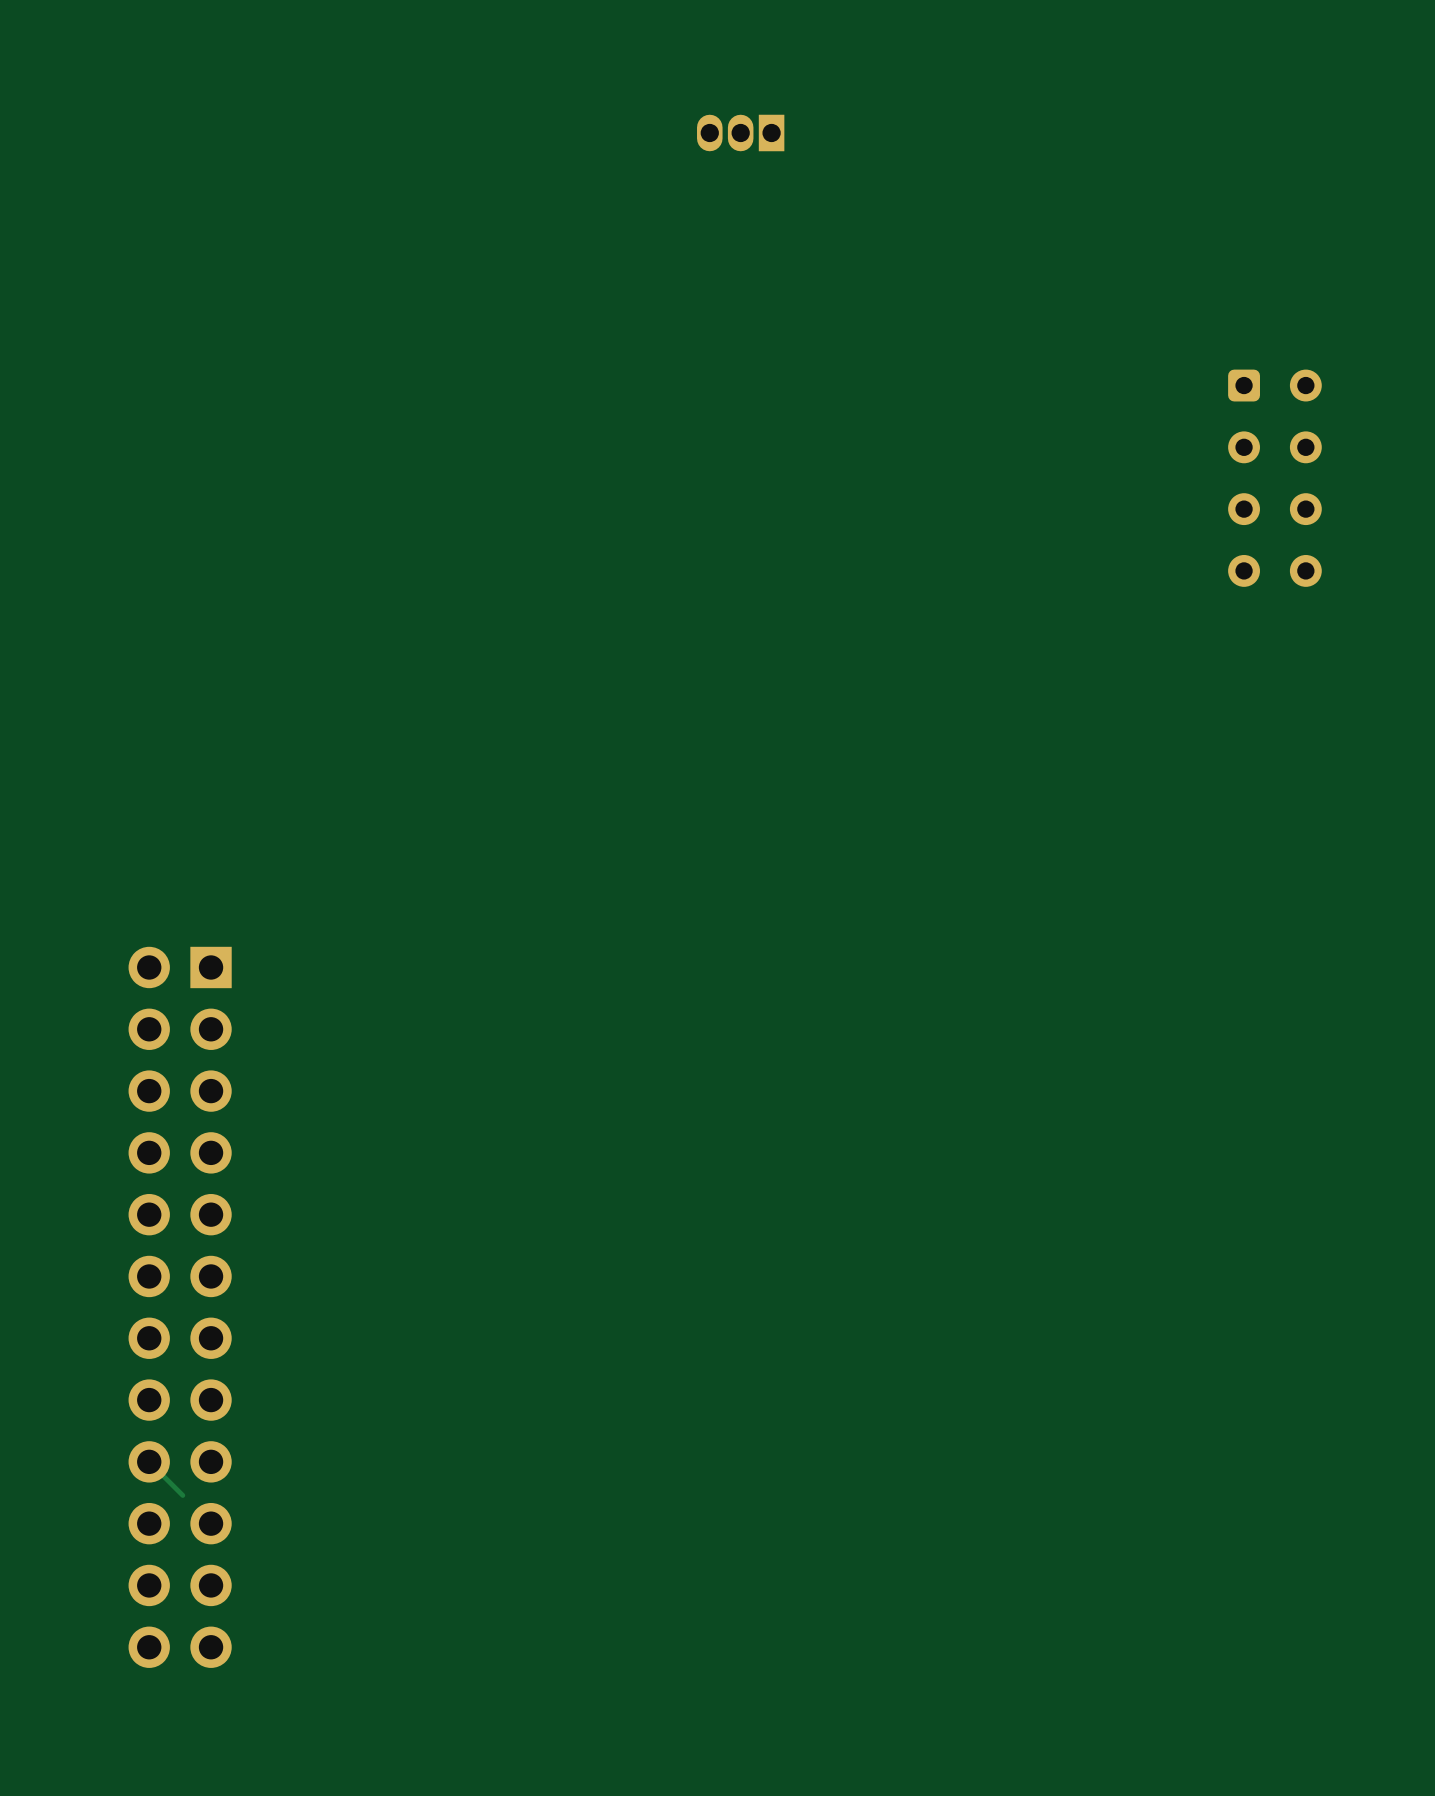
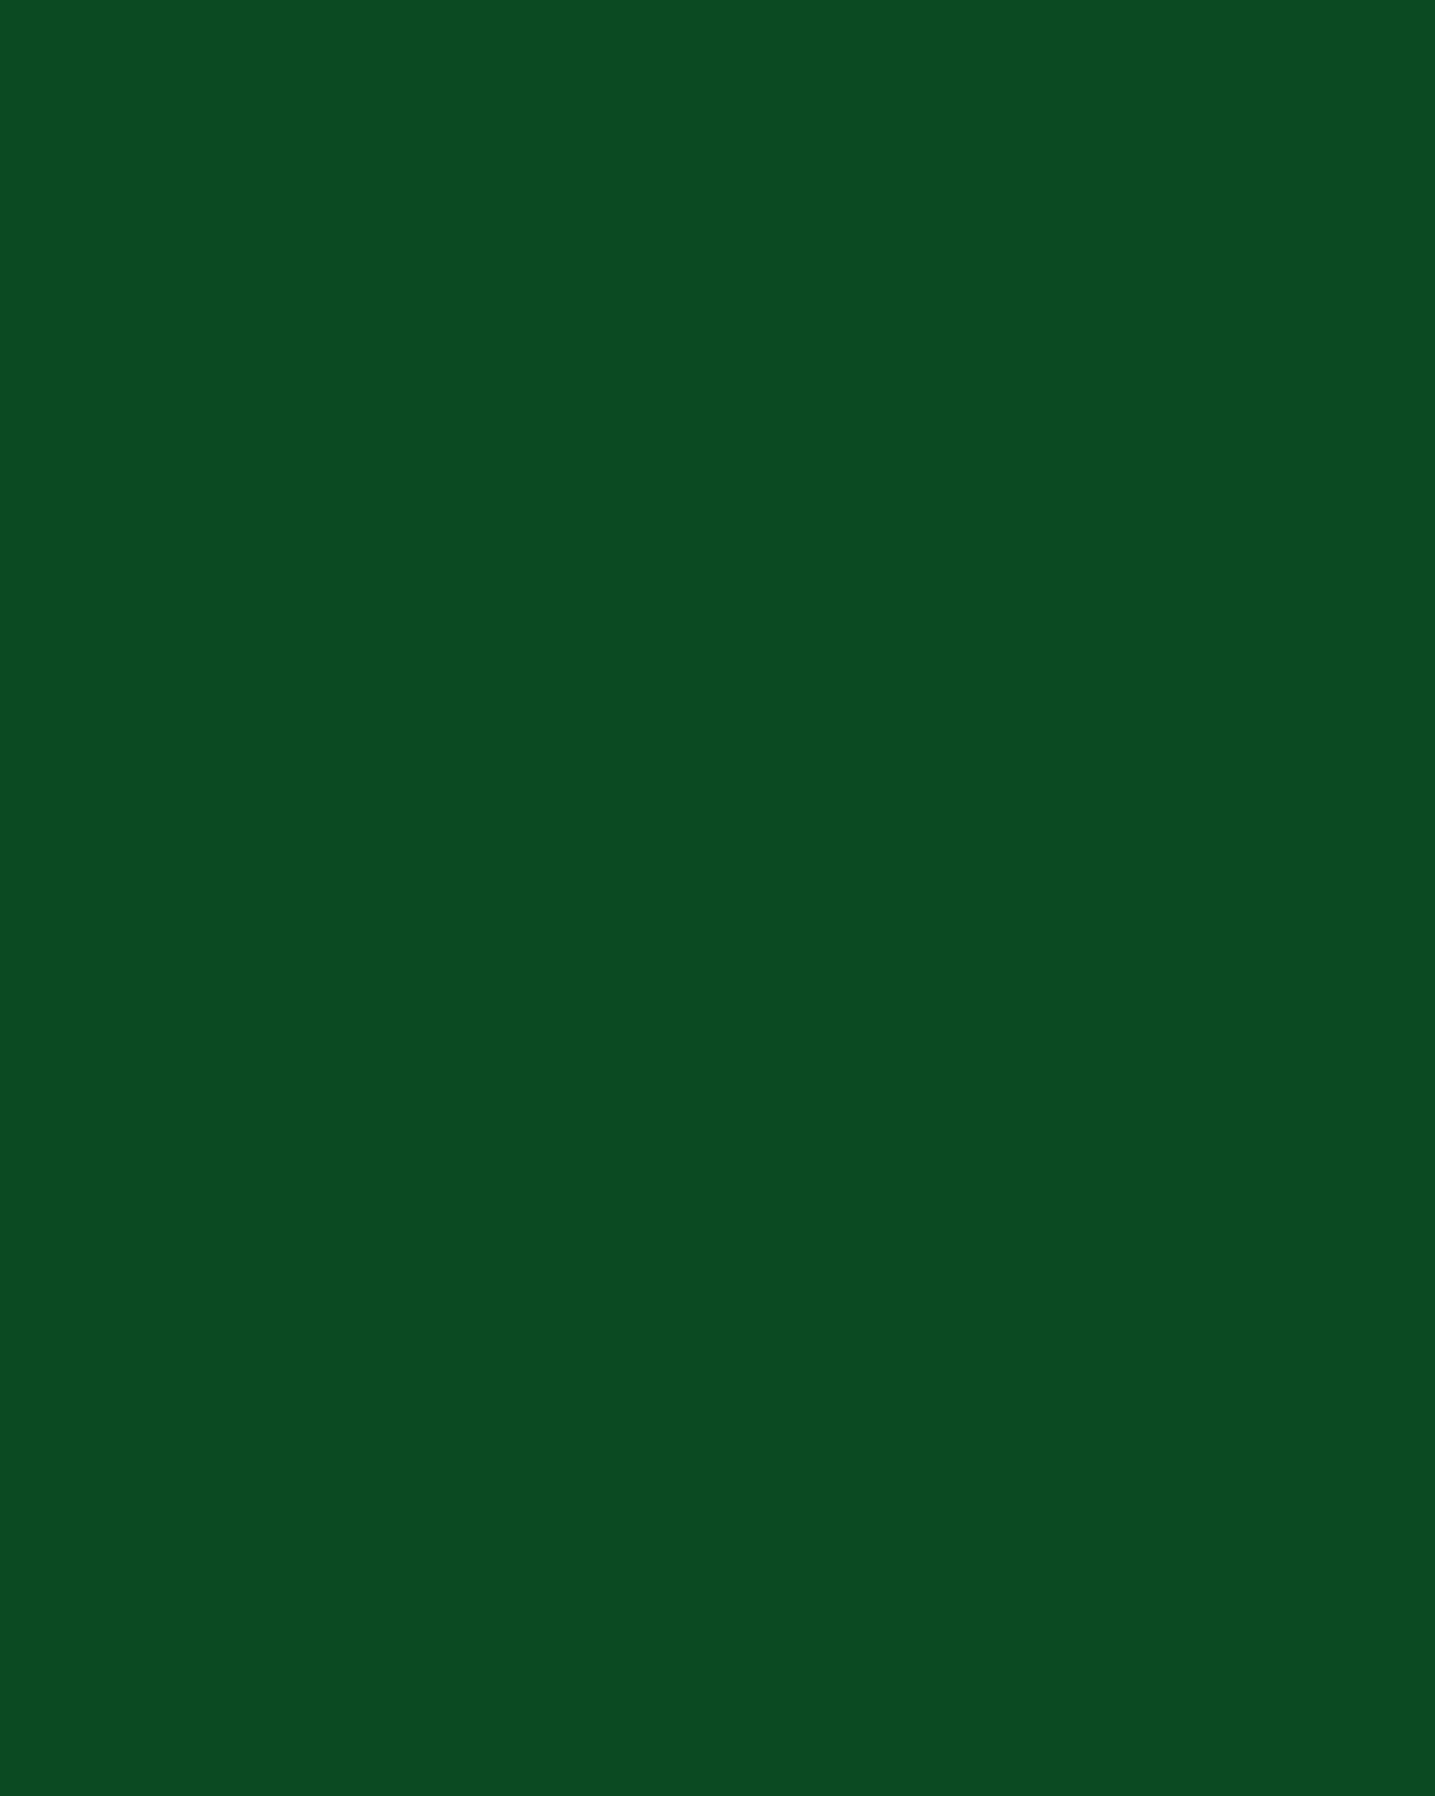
part: (740, 132) -> none
part: (1274, 478) -> none
part: (180, 1307) -> none
track: (149, 1461) (182, 1495) -> none

